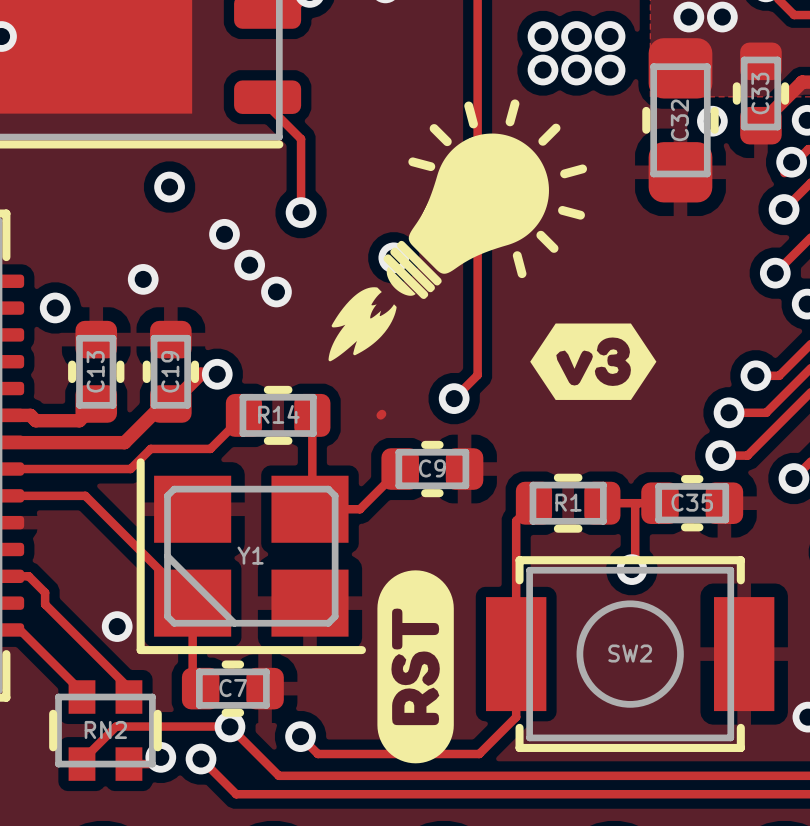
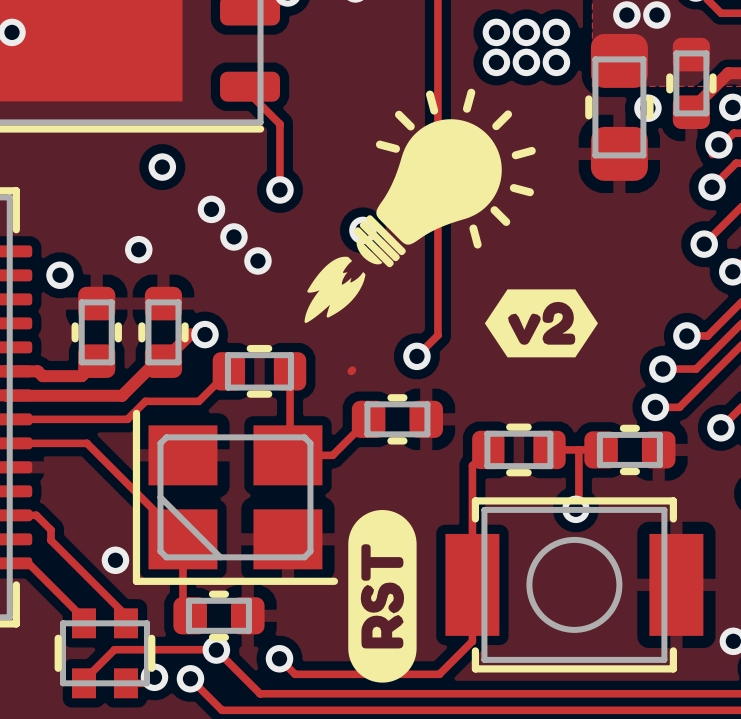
C33 name: C33 (760, 93) -> none
C32 name: C32 (679, 120) -> none
drawing shape: [530, 323, 657, 400] -> [484, 289, 598, 358]
C13 name: C13 (95, 371) -> none
C19 name: C19 (170, 371) -> none
R14 name: R14 (278, 414) -> none
C9 name: C9 (432, 468) -> none
R1 name: R1 (568, 502) -> none
C35 name: C35 (692, 502) -> none
Y1 name: Y1 (250, 555) -> none
SW2 name: SW2 (630, 653) -> none
C7 name: C7 (233, 688) -> none
RN2 name: RN2 (105, 729) -> none

